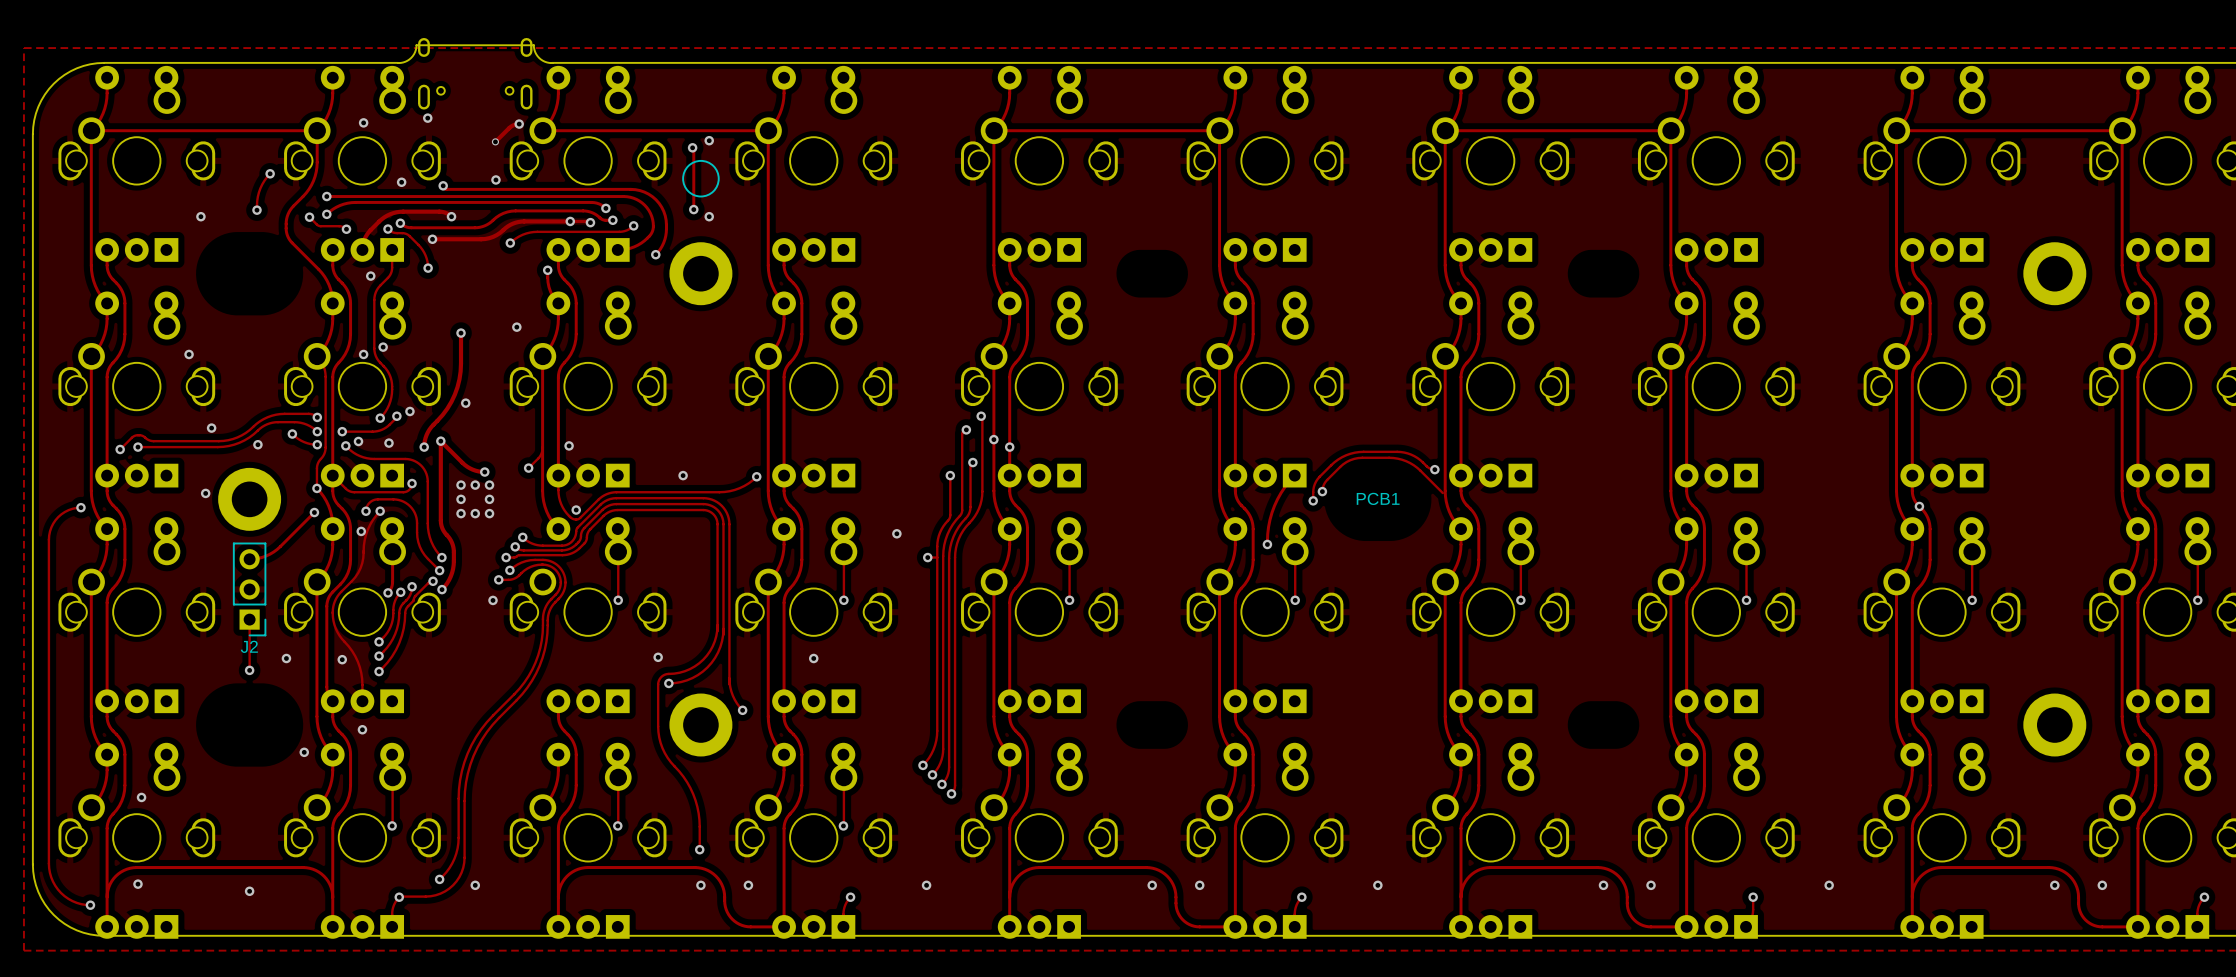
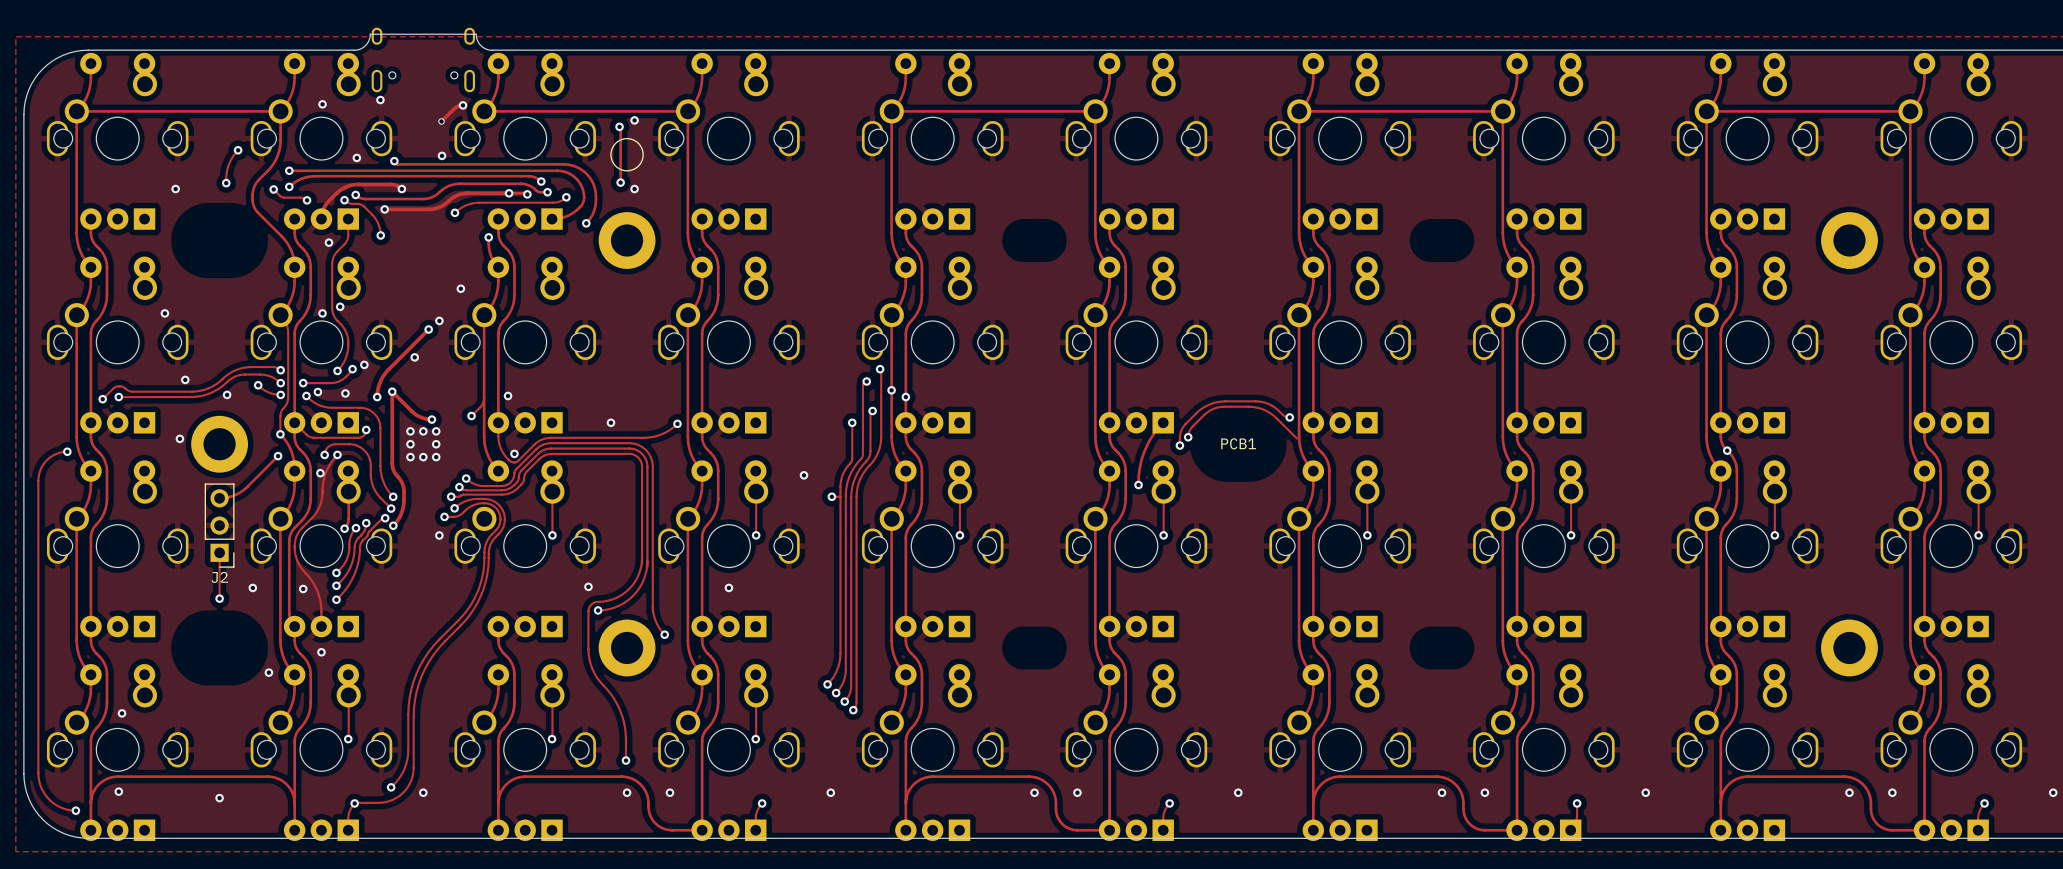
track: (461, 333) (460, 371) (457, 387) (447, 408) (427, 432) (424, 447) -> (428, 329) (386, 372) (378, 385) (377, 397)
via: (461, 333) -> none
via: none -> (439, 320)
via: none -> (428, 329)

